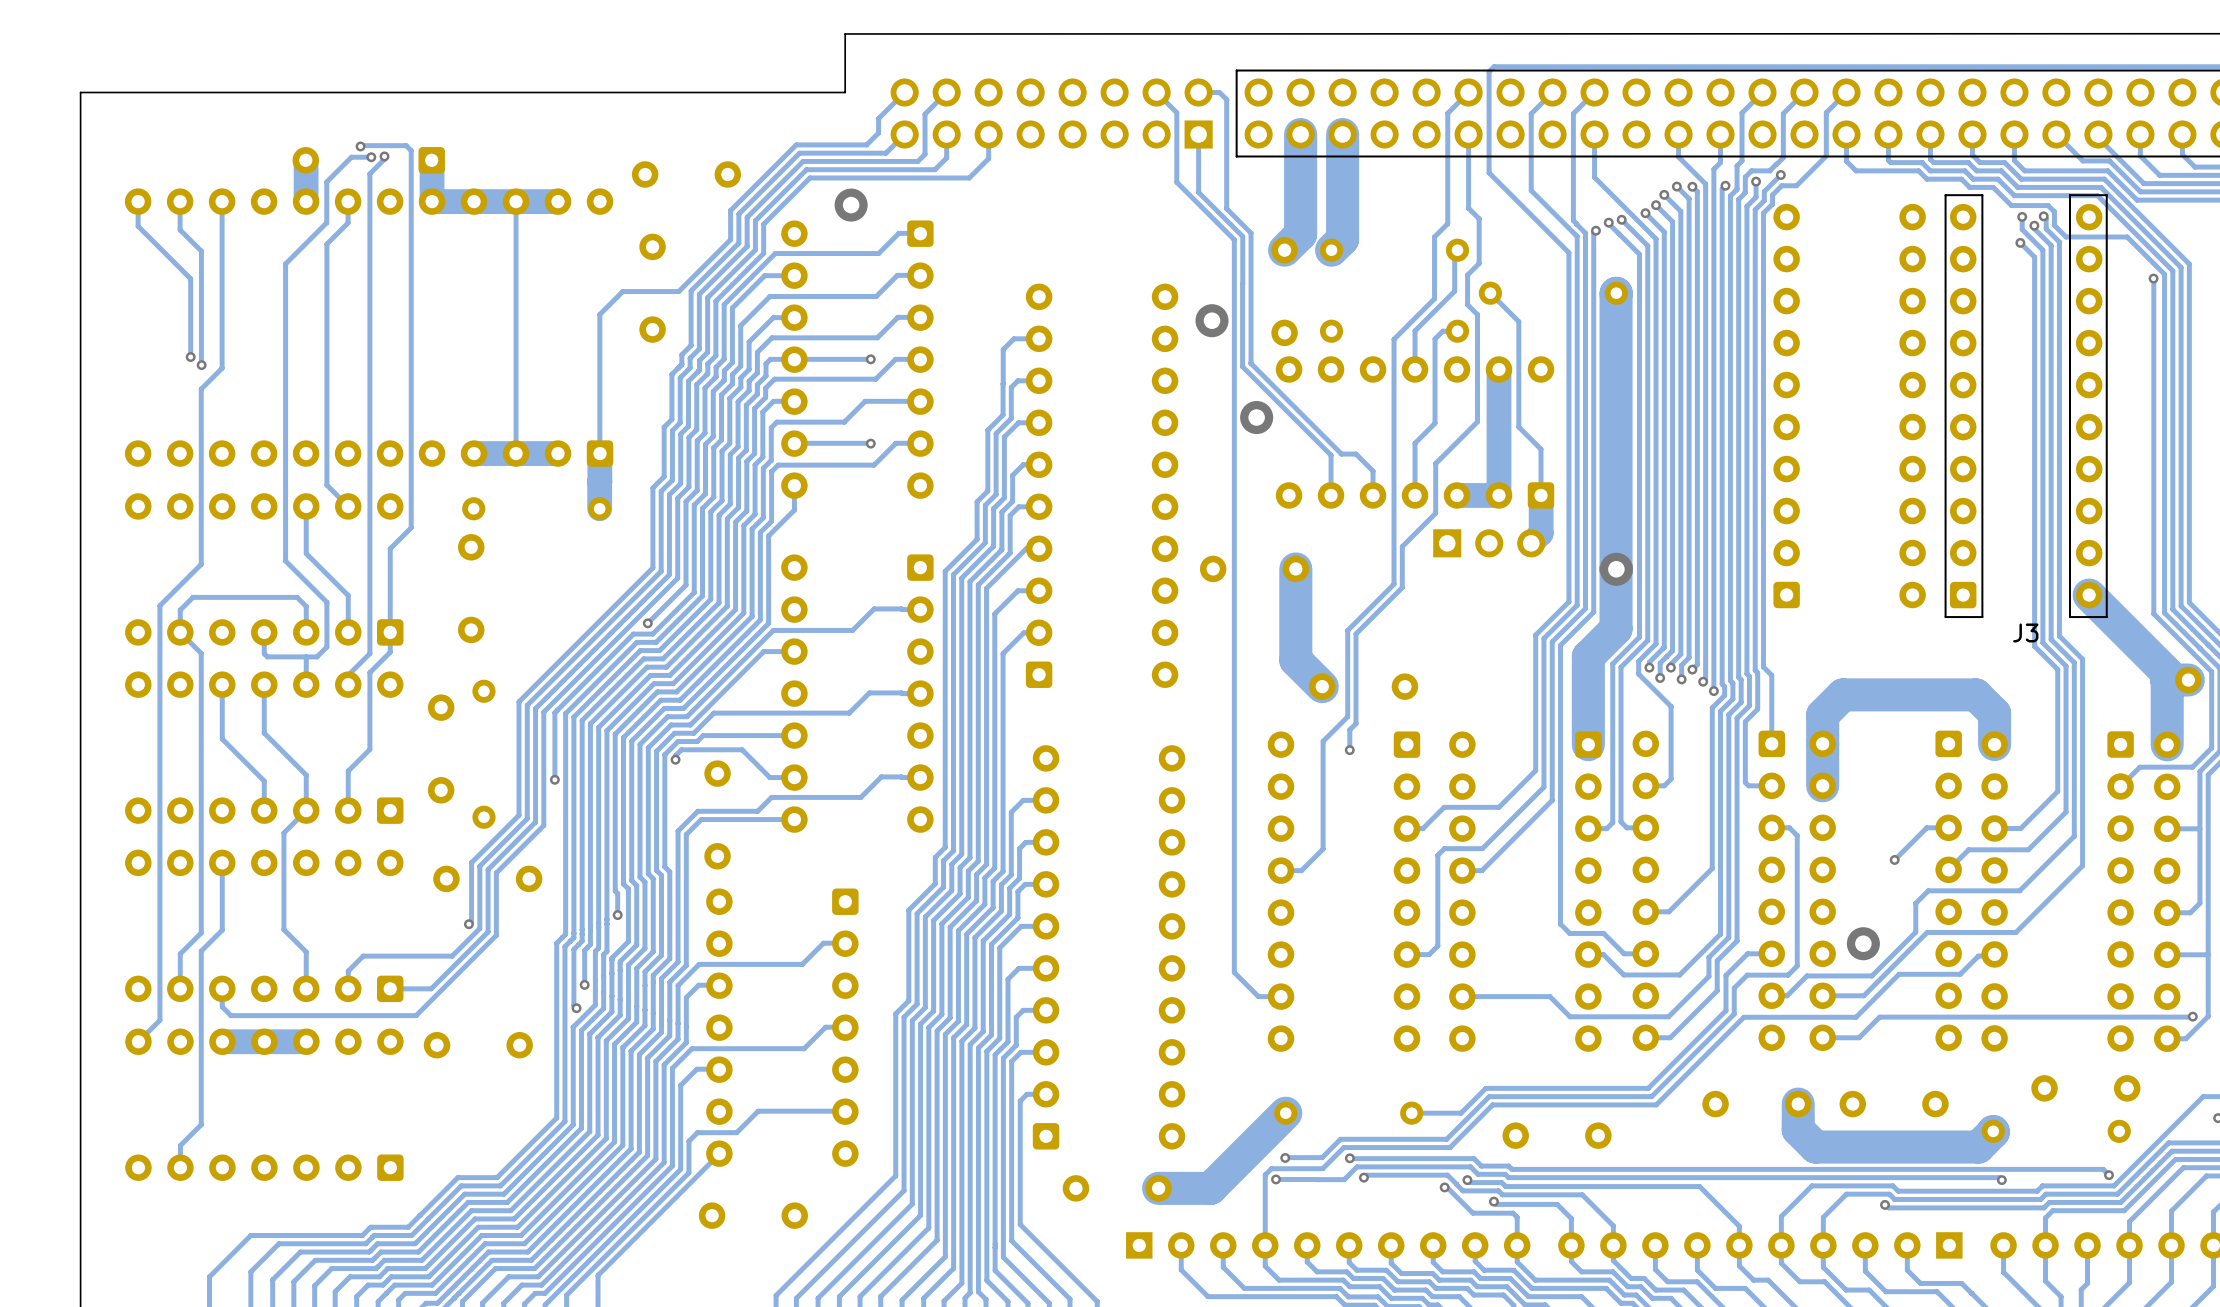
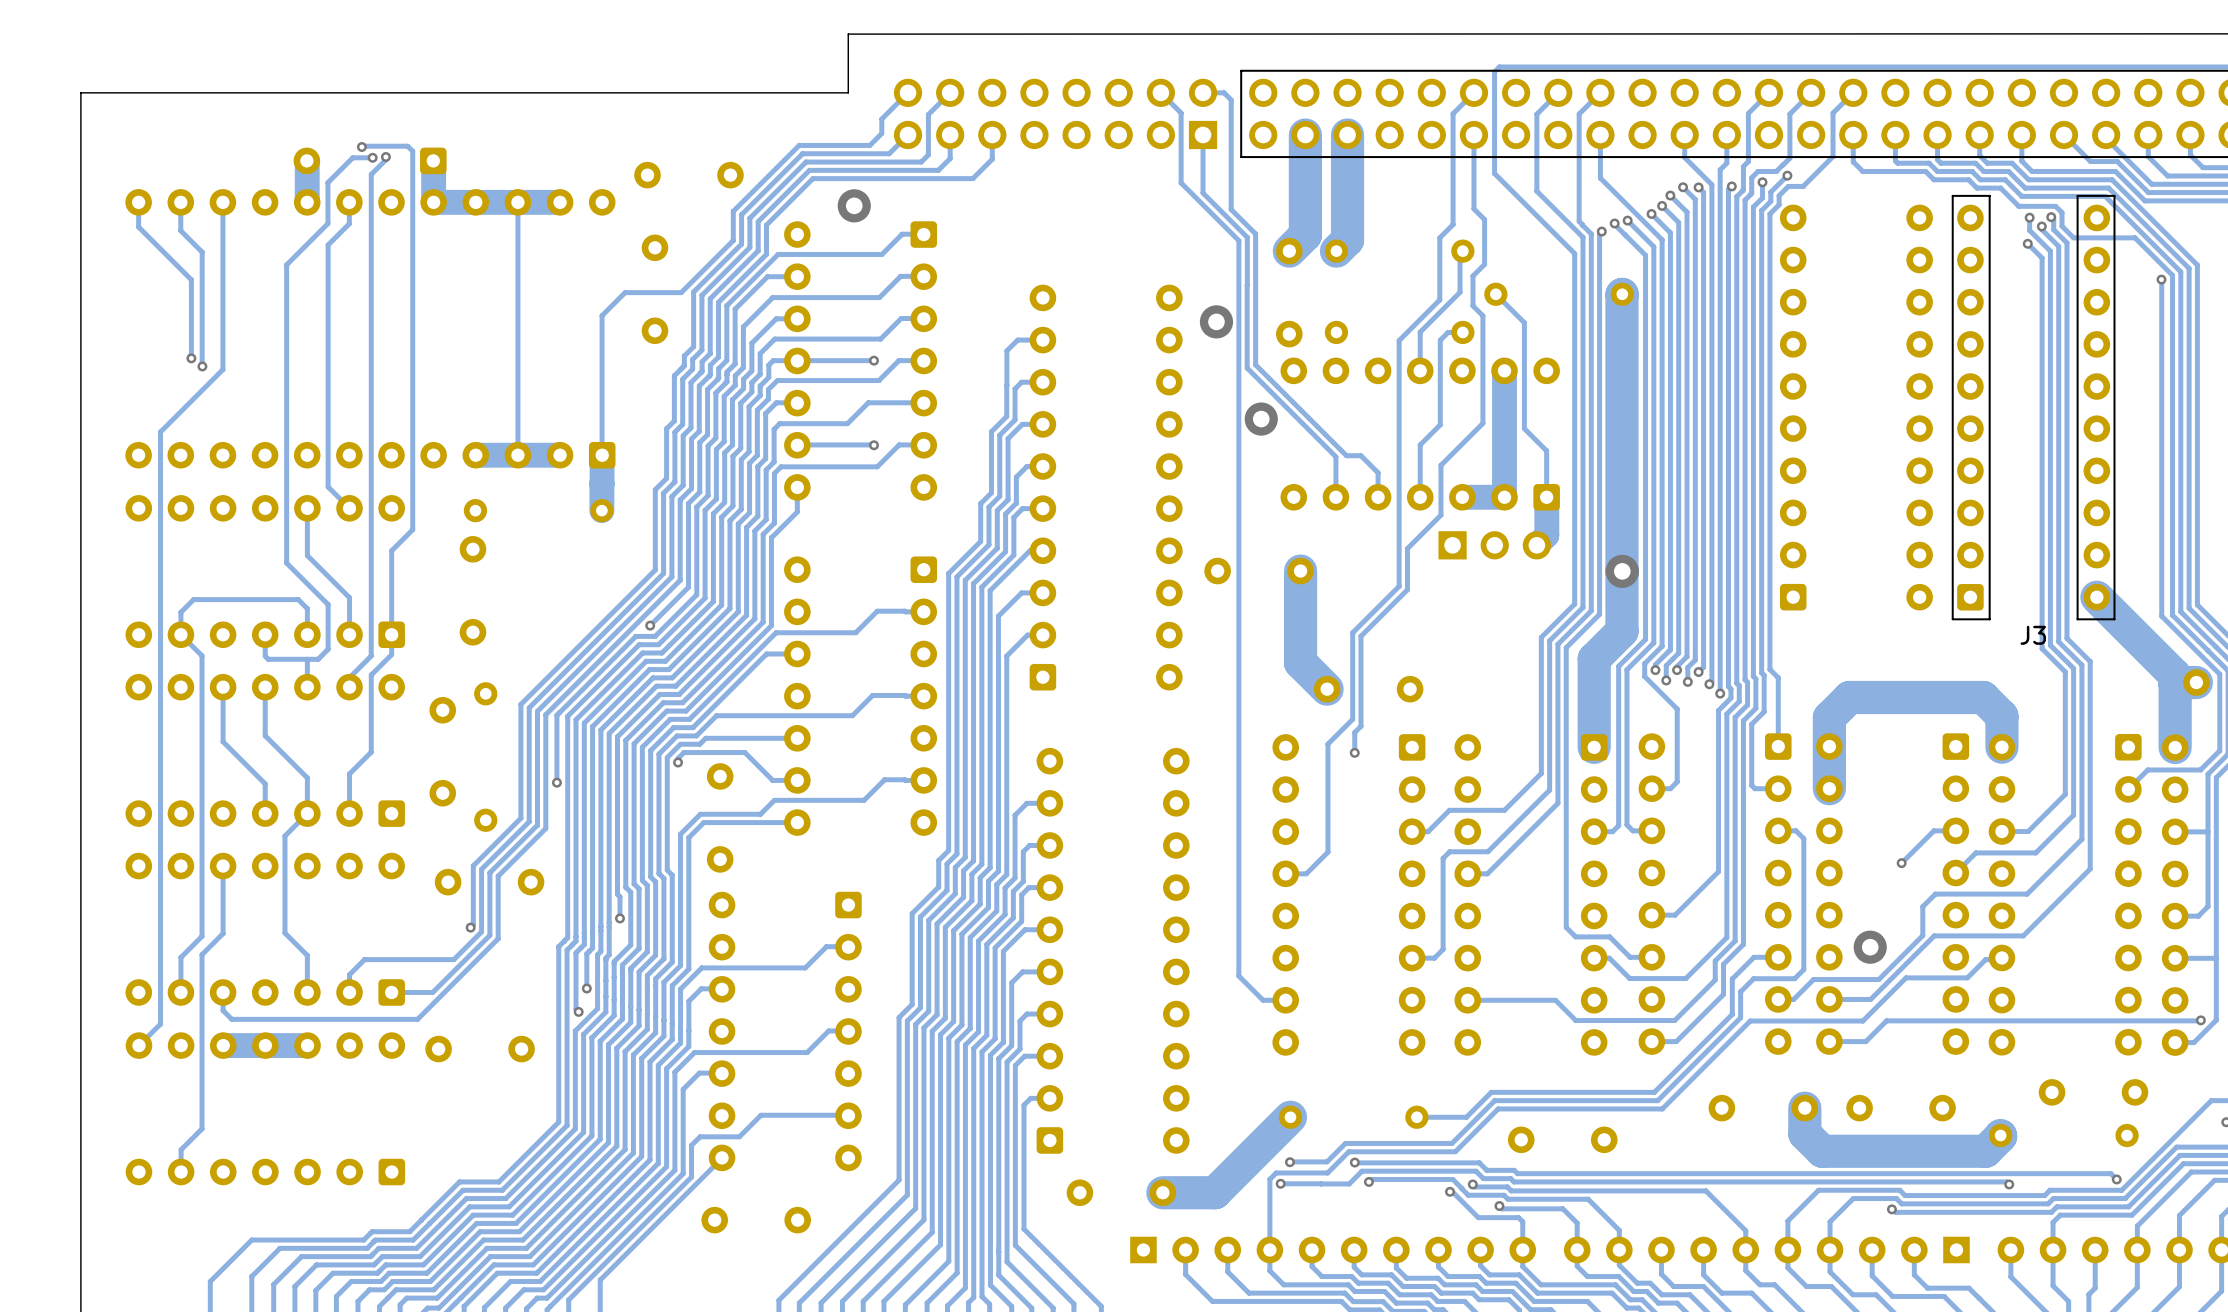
track: (201, 389) (201, 564) (159, 605) -> (202, 390) (160, 431) (160, 607)

